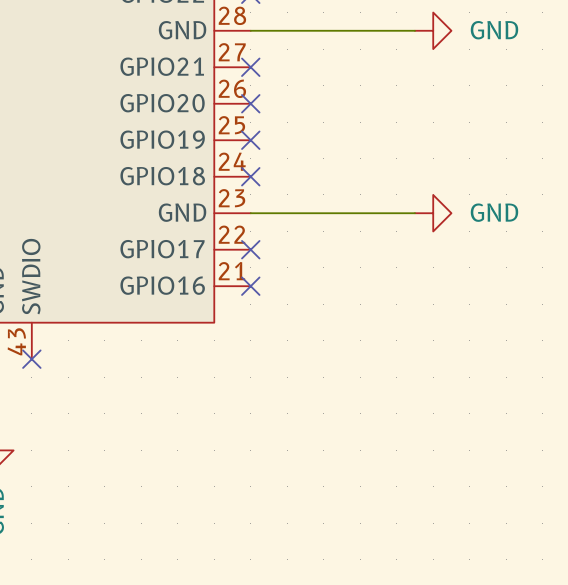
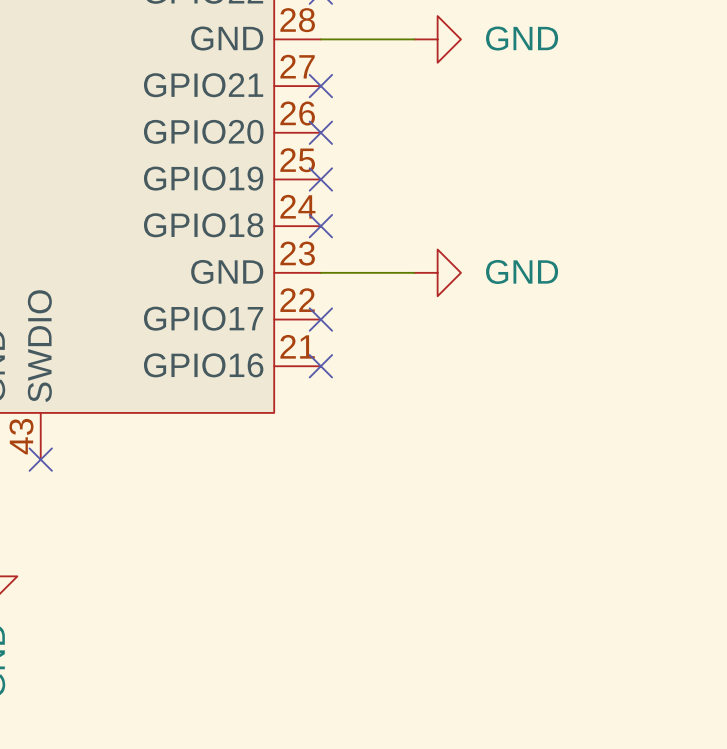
wire: (323, 30) (414, 30) -> none
power symbol position: GND (433, 30) -> GND (437, 39)
wire: (323, 213) (414, 213) -> none
power symbol position: GND (433, 213) -> GND (437, 272)

